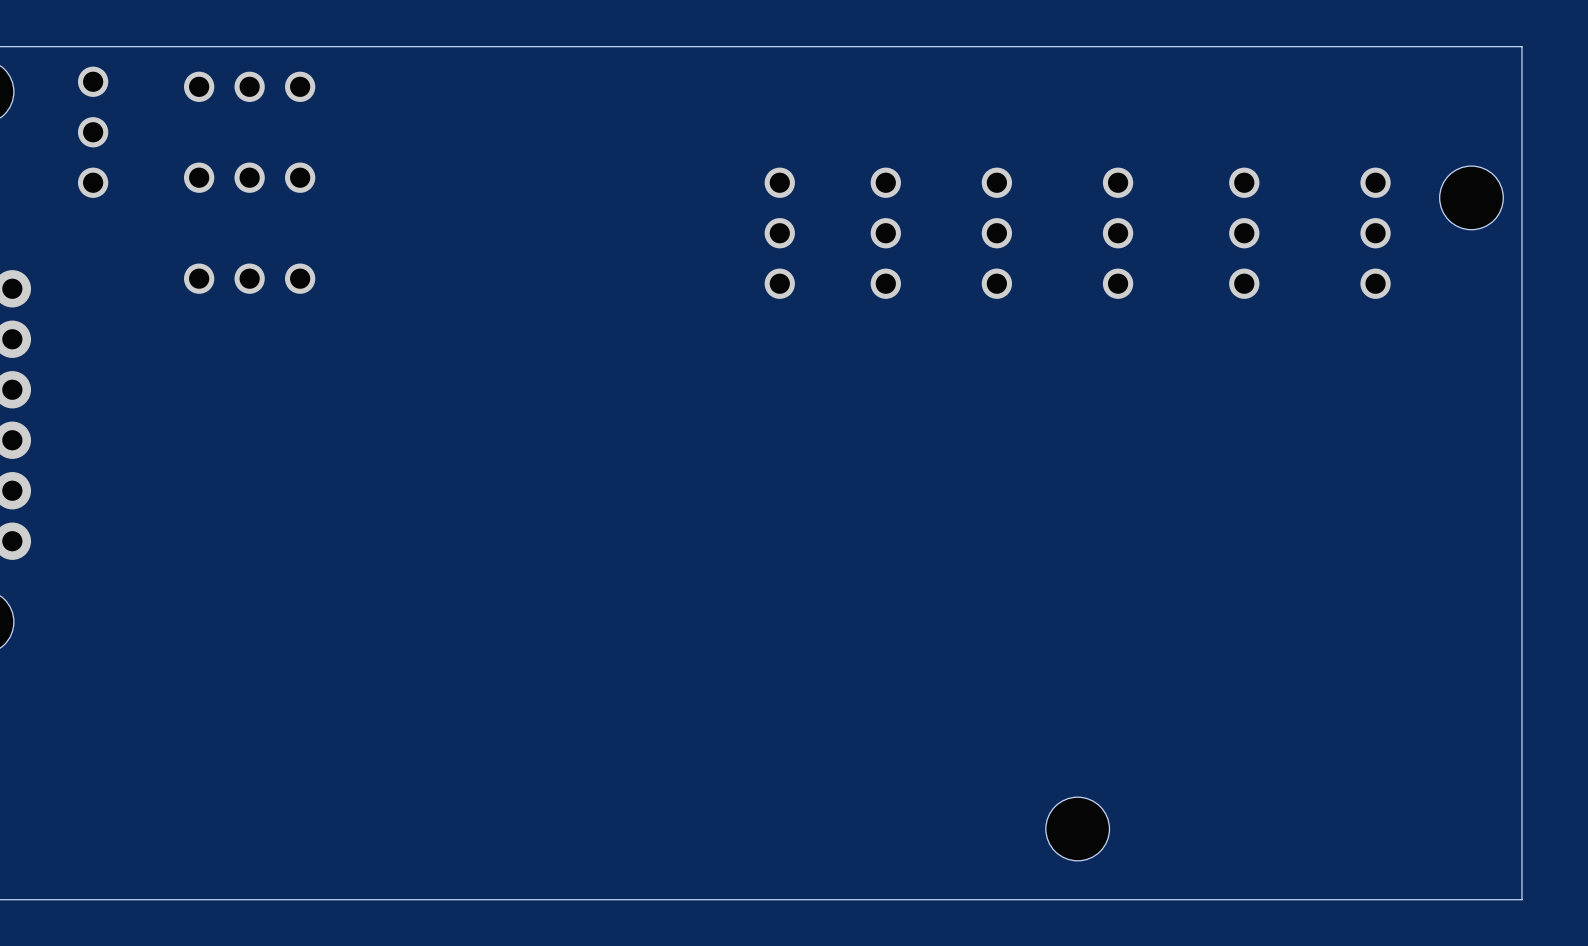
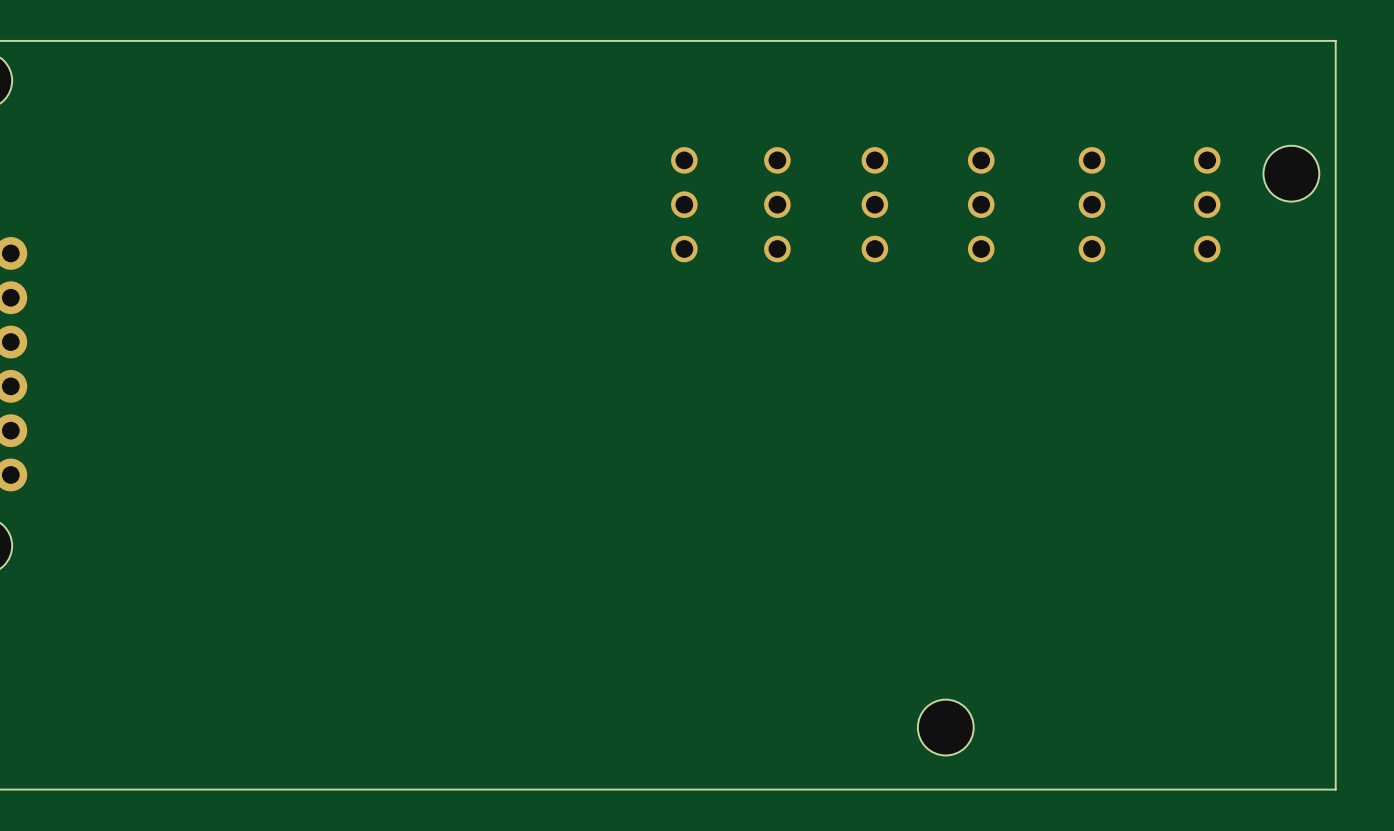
part: (249, 86) -> none
part: (93, 132) -> none
part: (249, 177) -> none
part: (249, 278) -> none

